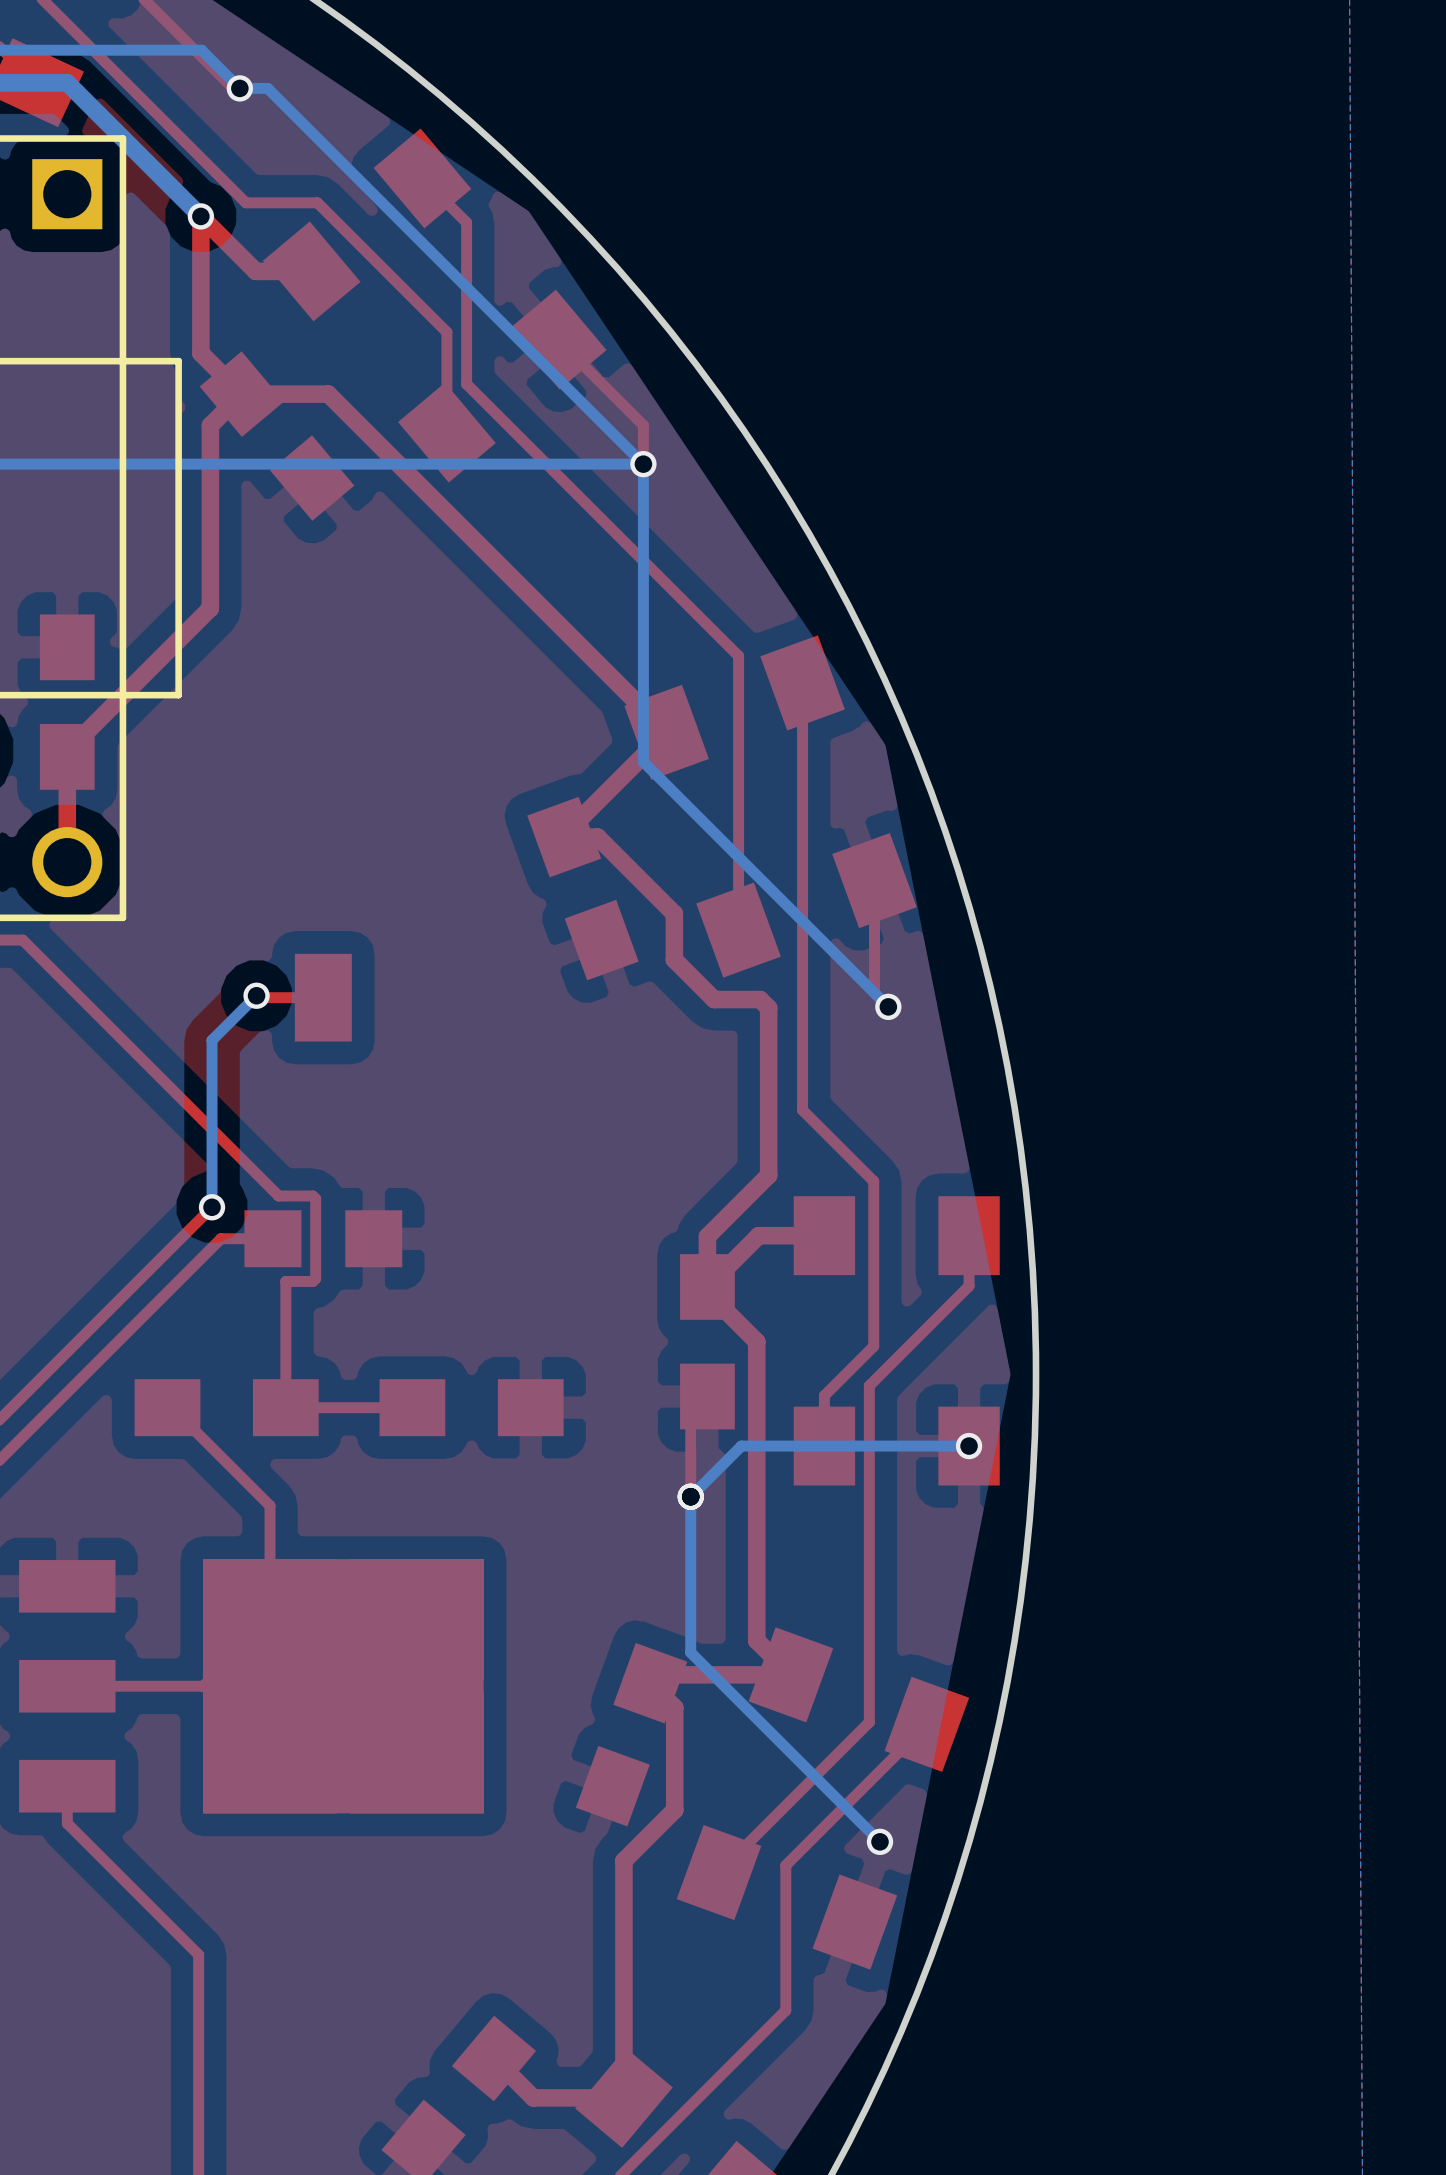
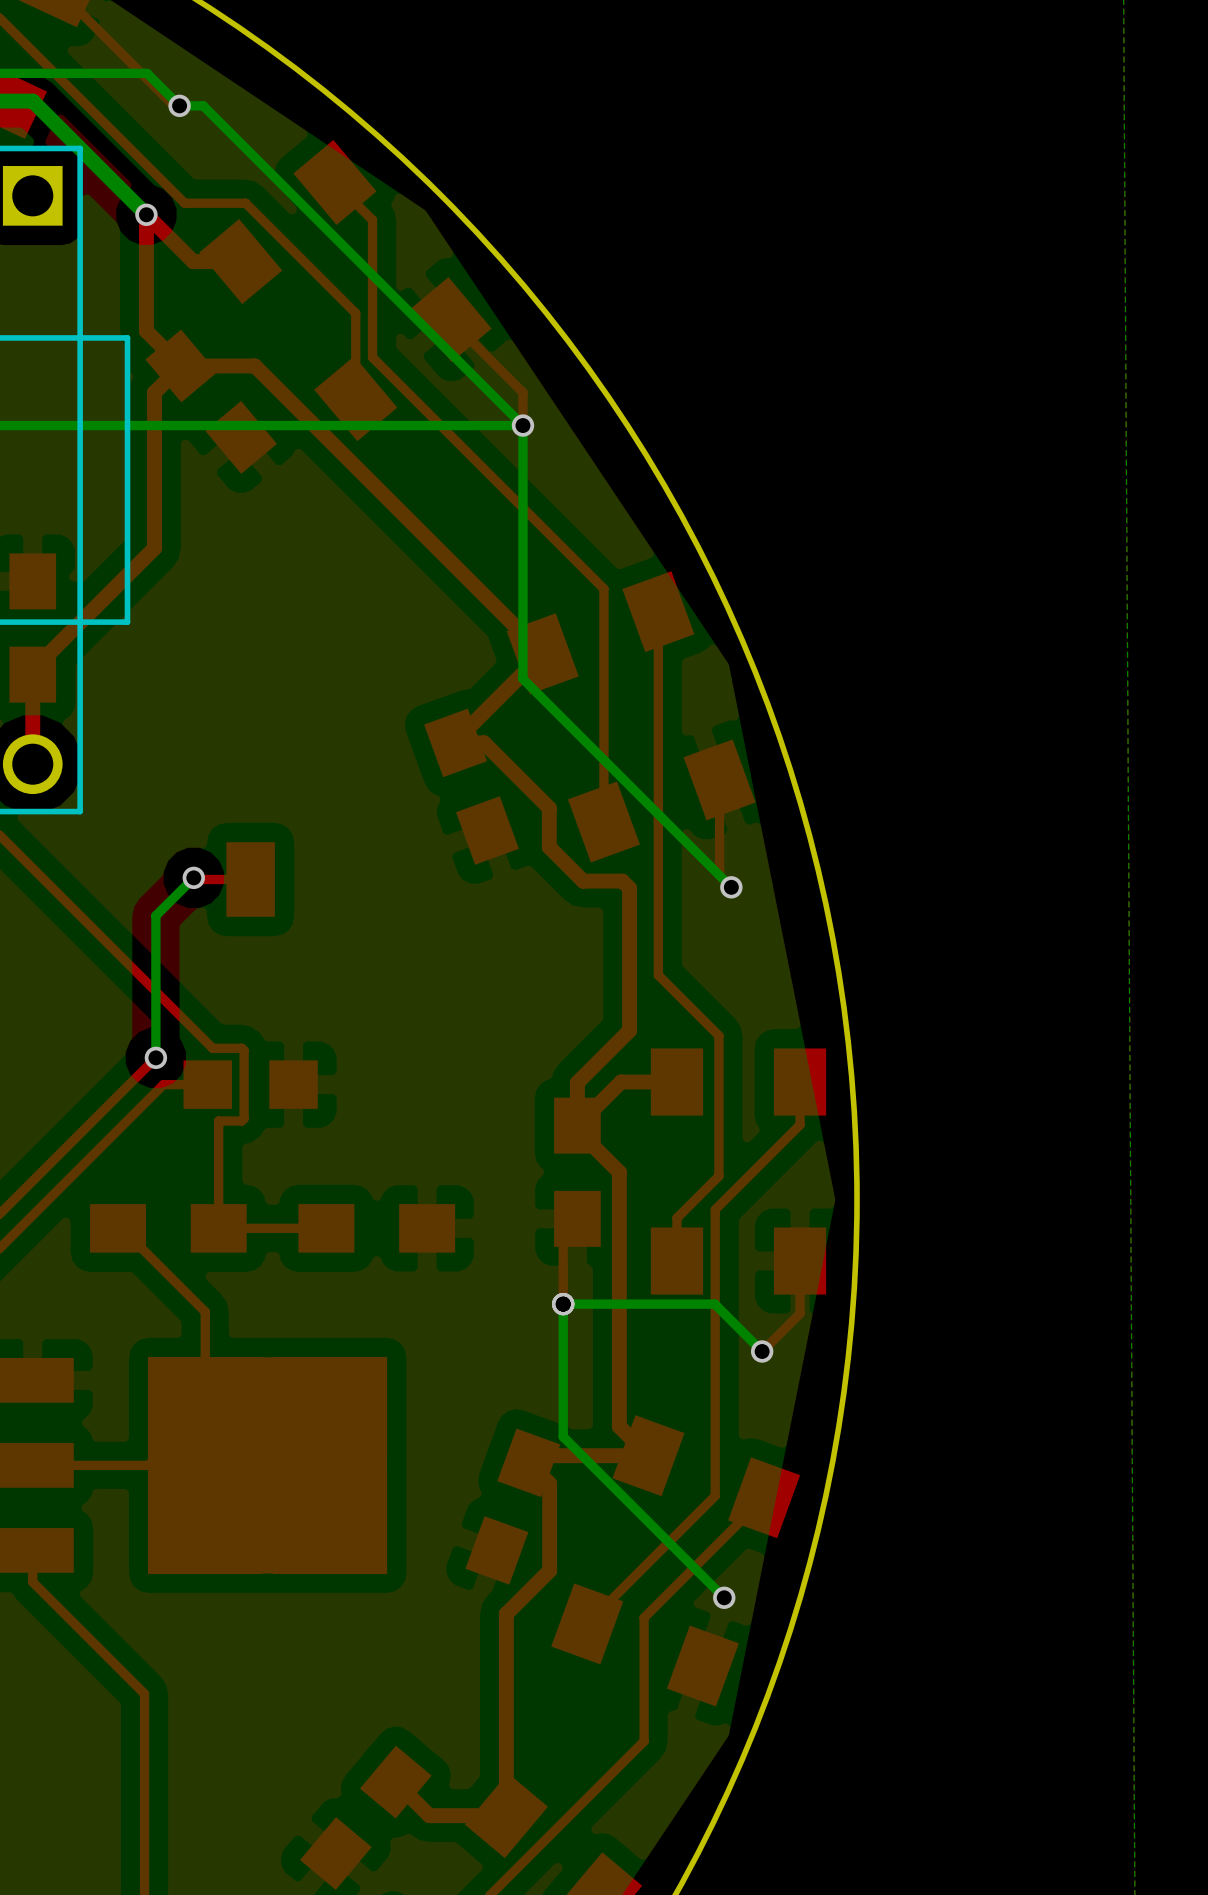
top track: none -> (800, 1261) (800, 1313) (762, 1351)
bottom track: (969, 1446) (741, 1446) (690, 1496) -> (762, 1351) (714, 1304) (563, 1304)
via position: (969, 1446) -> (762, 1351)

